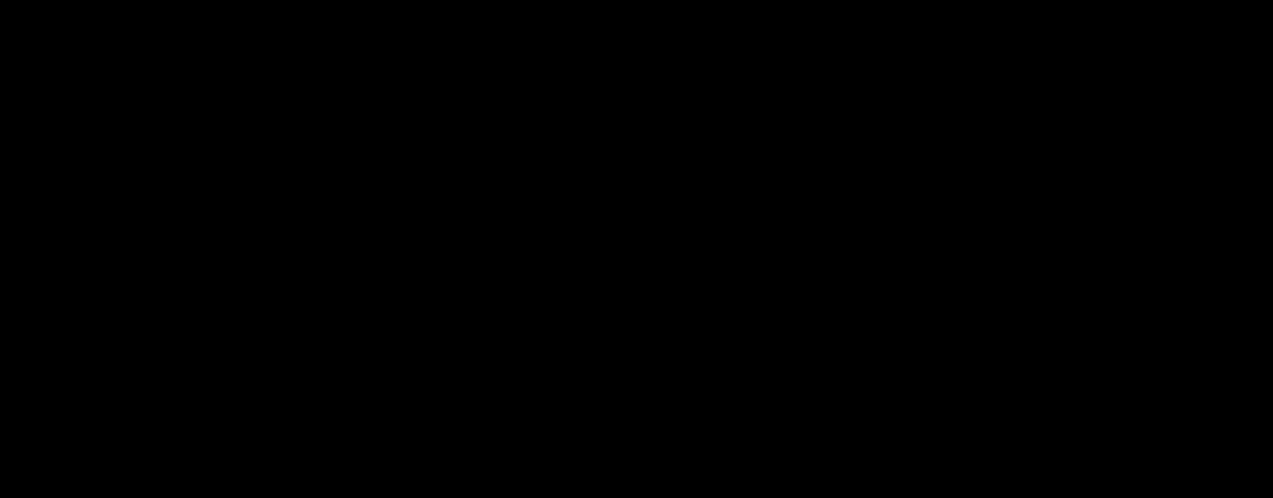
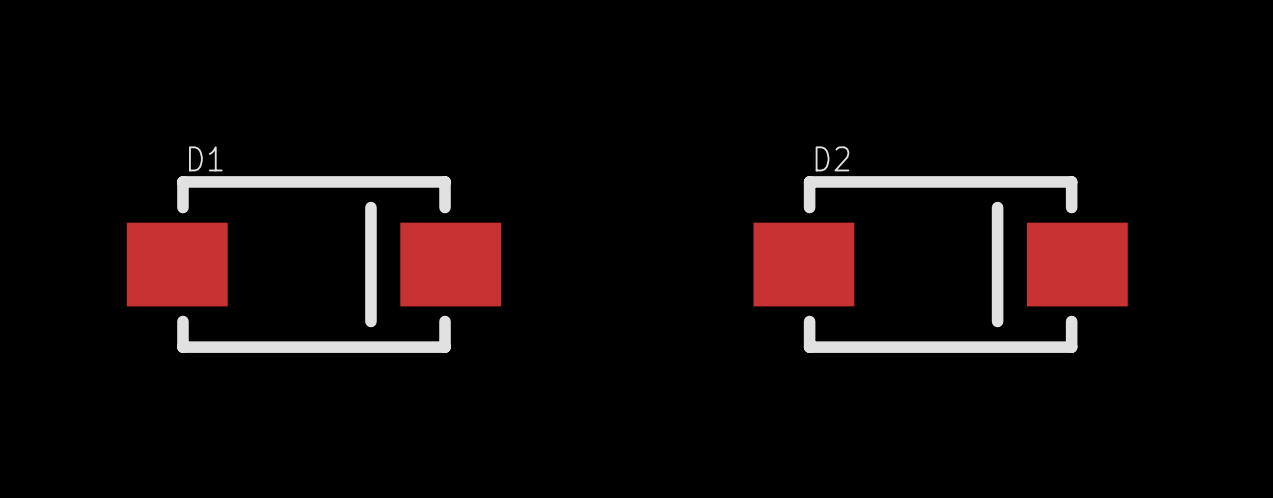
D1: none -> (313, 264)
D2: none -> (940, 264)

